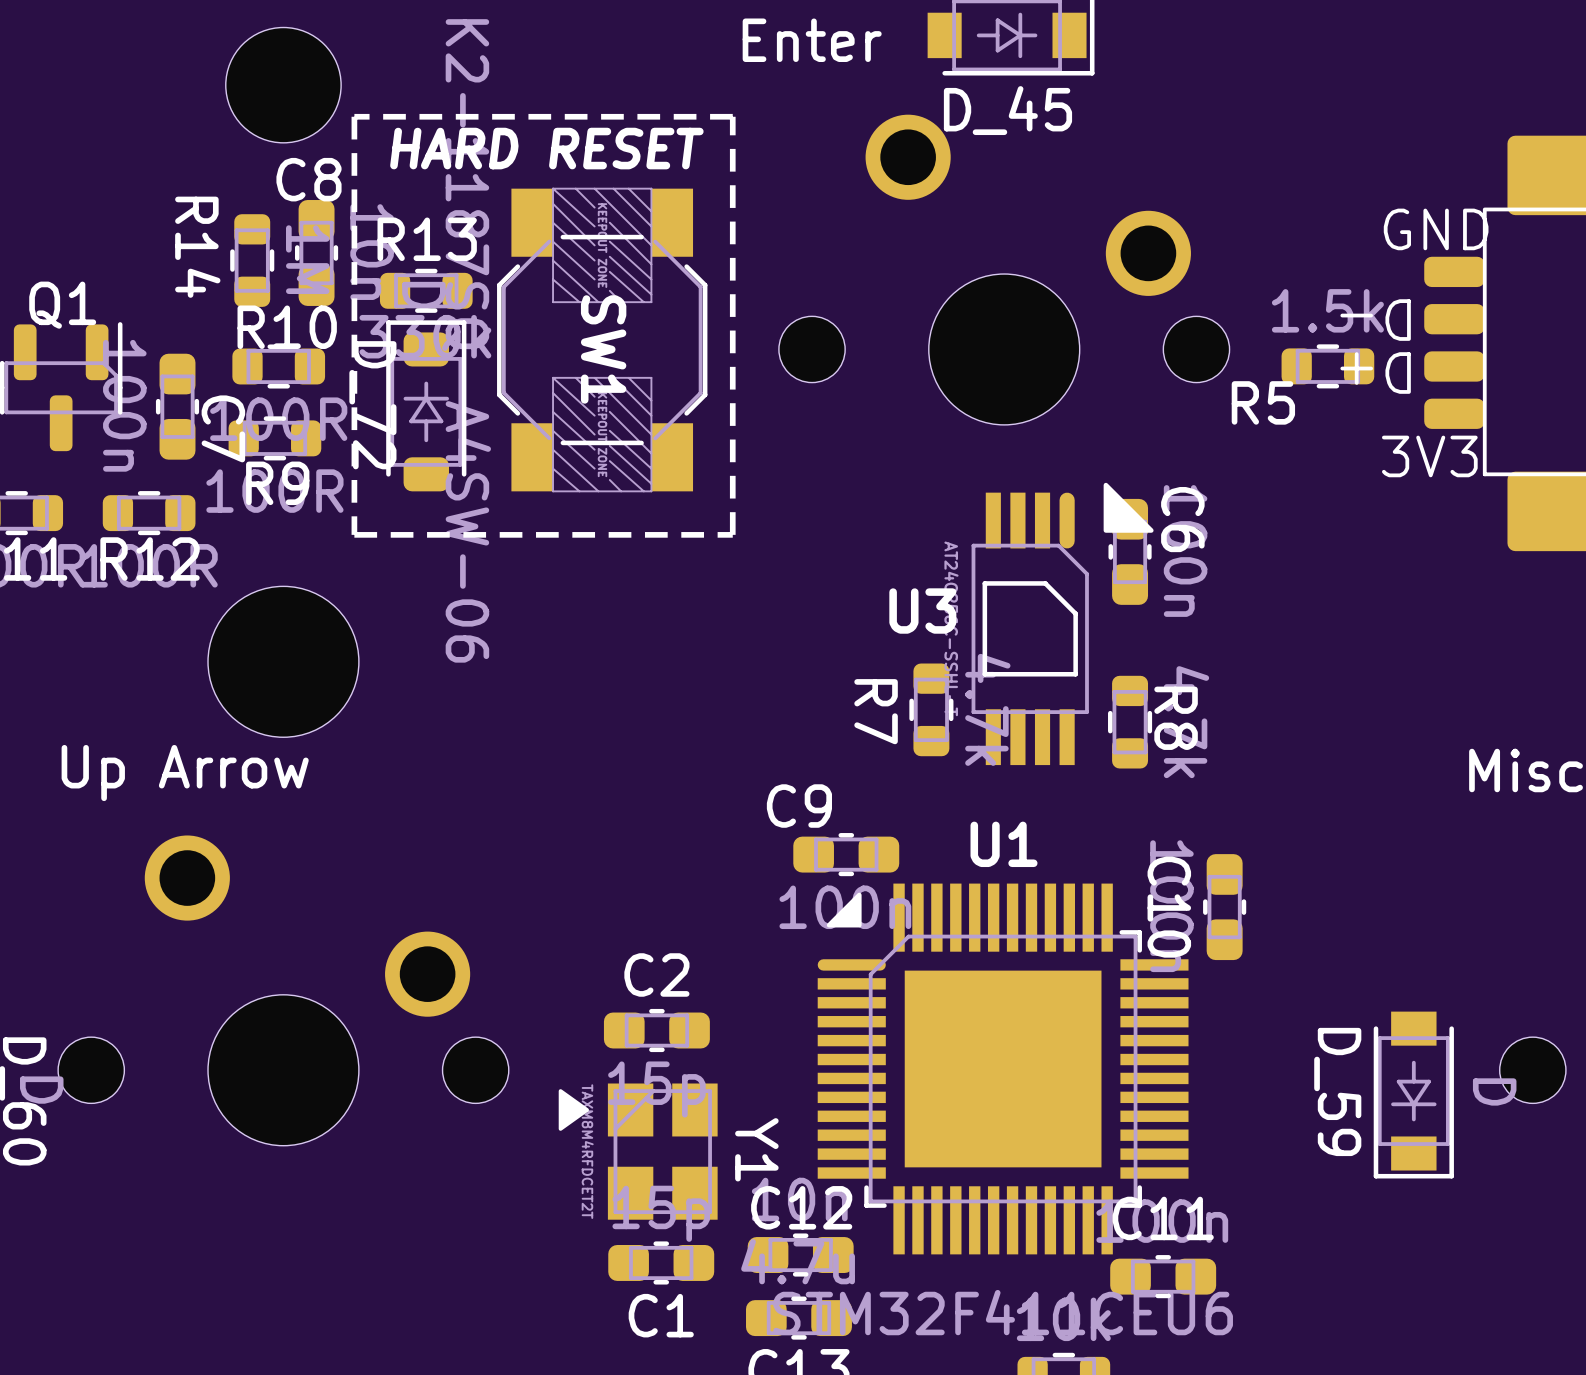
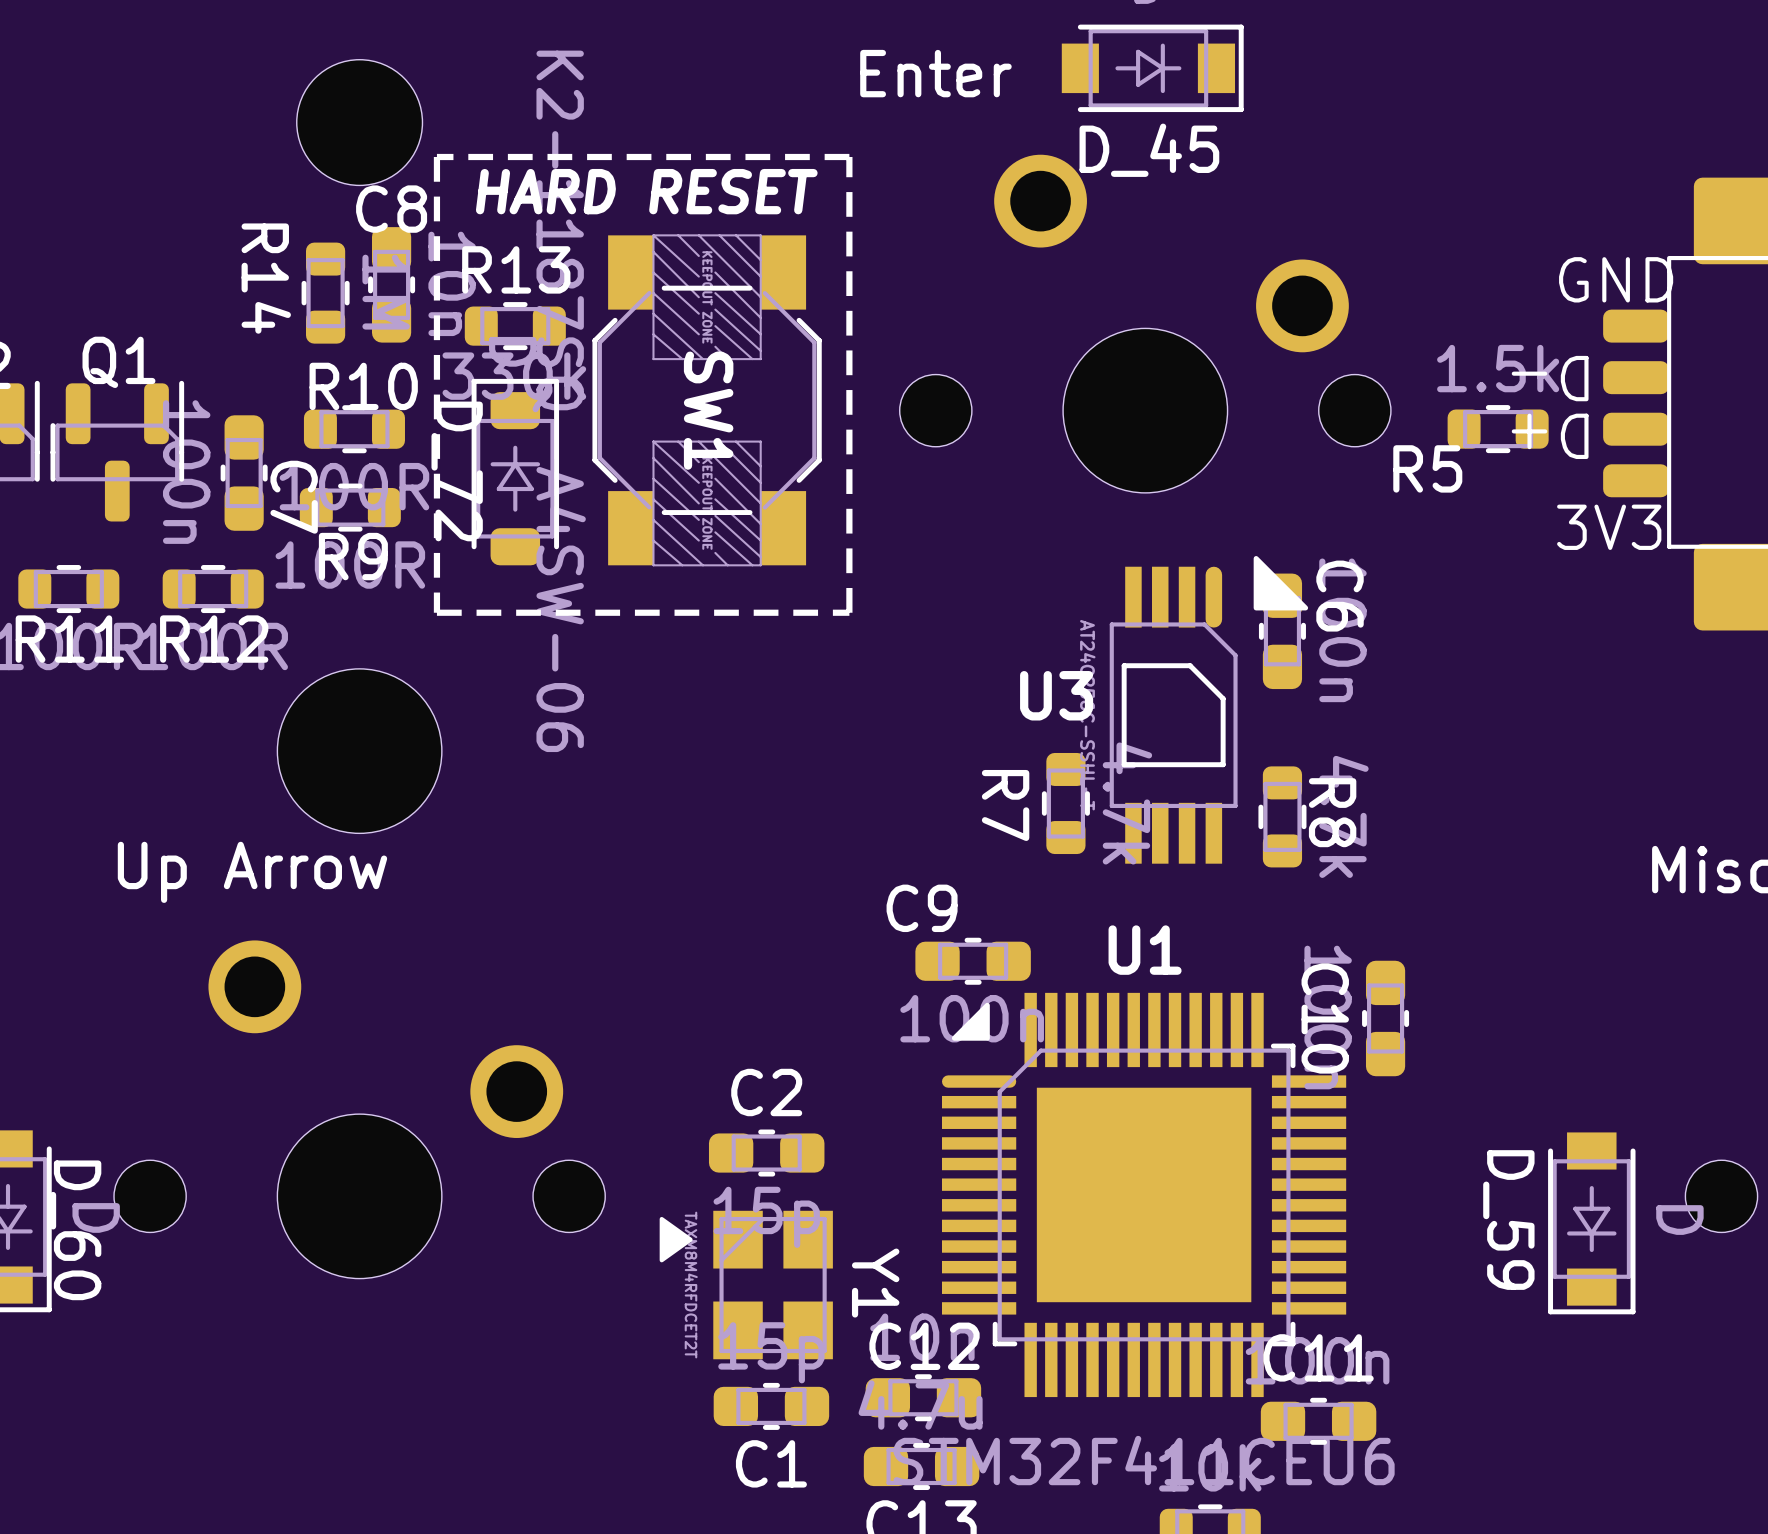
C8 name position: C8 (308, 179) -> C8 (391, 209)
C8 position: (316, 252) -> (391, 284)
R14 position: (252, 260) -> (325, 293)
R13 position: (426, 290) -> (515, 326)

